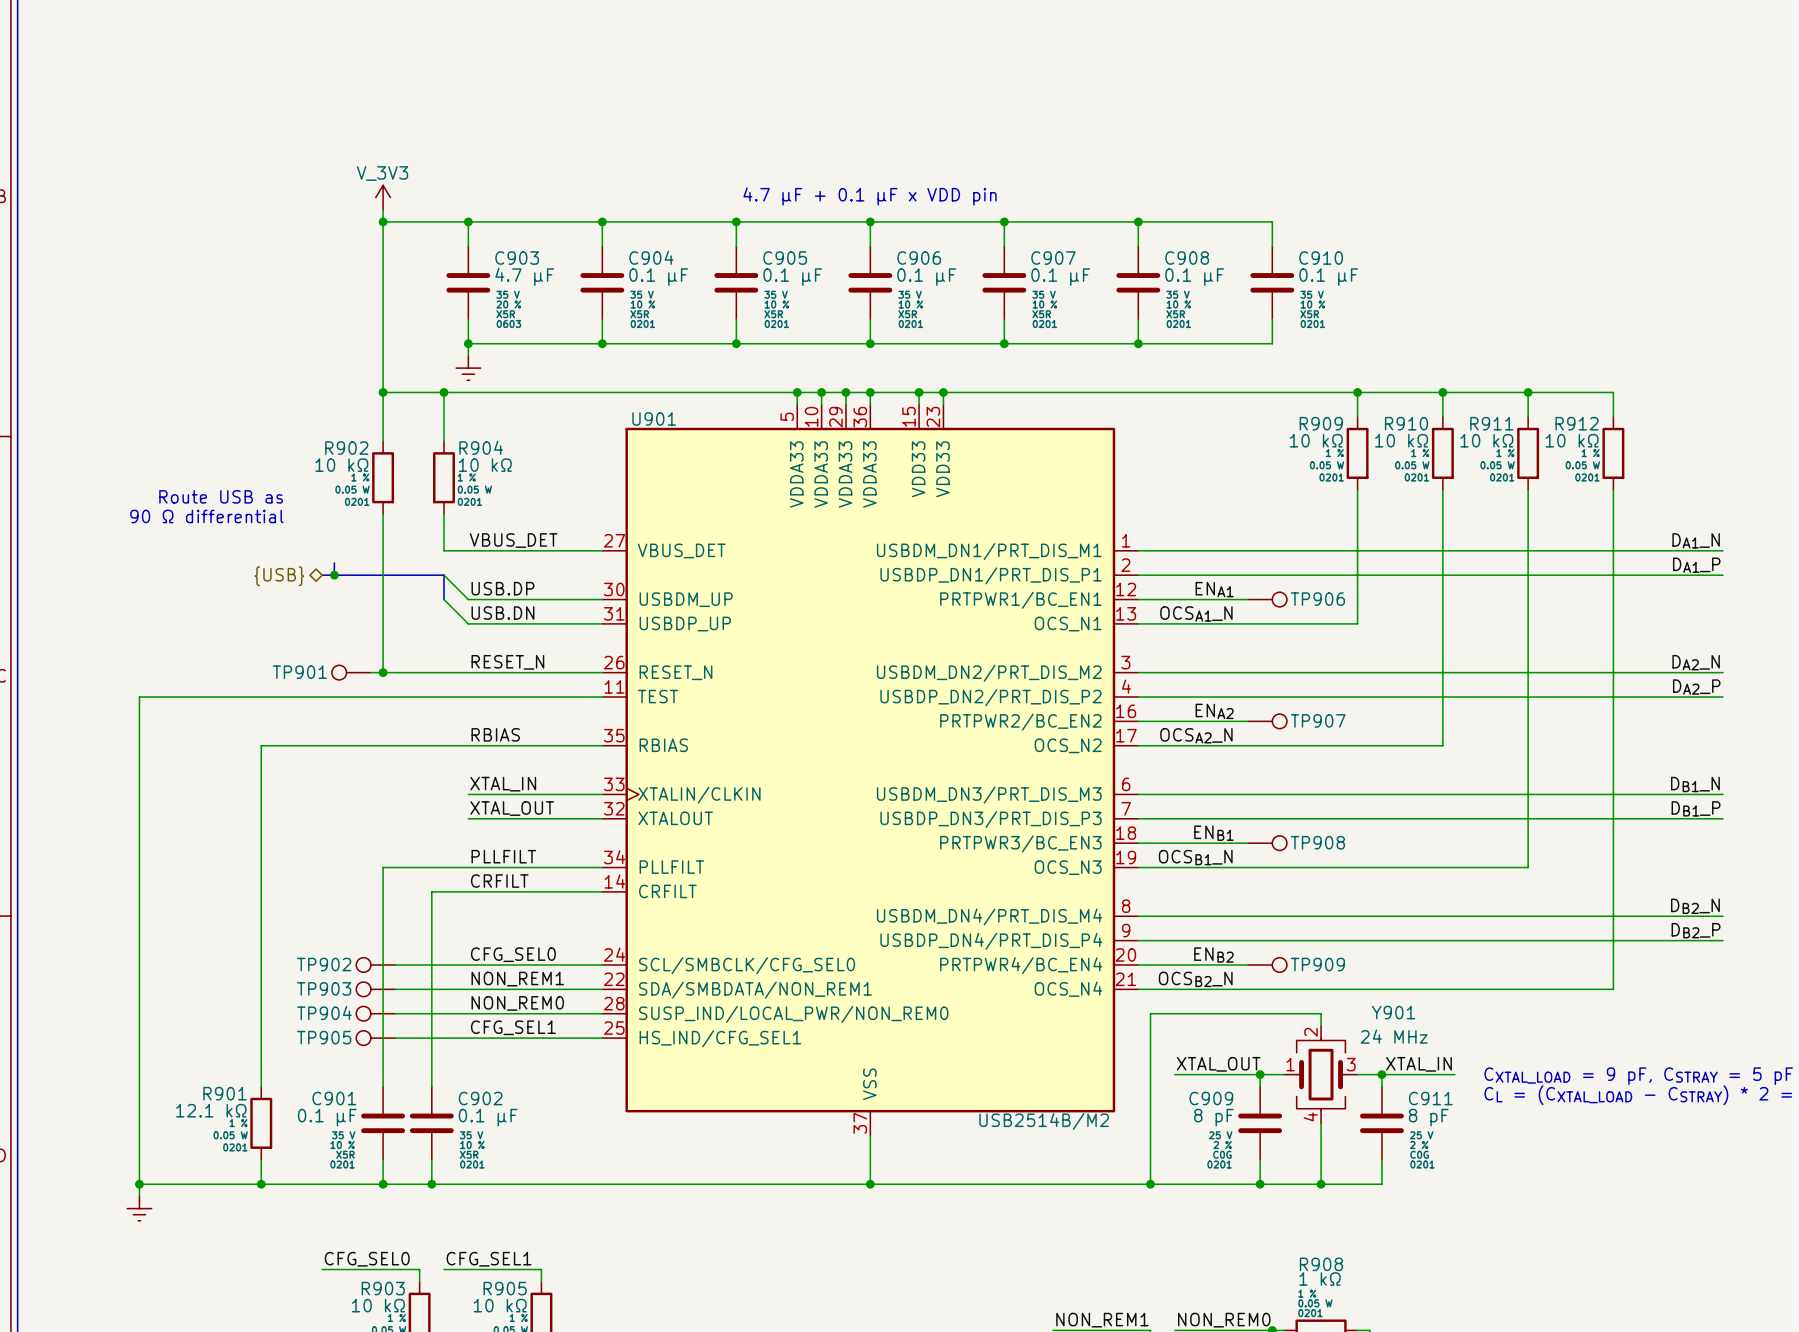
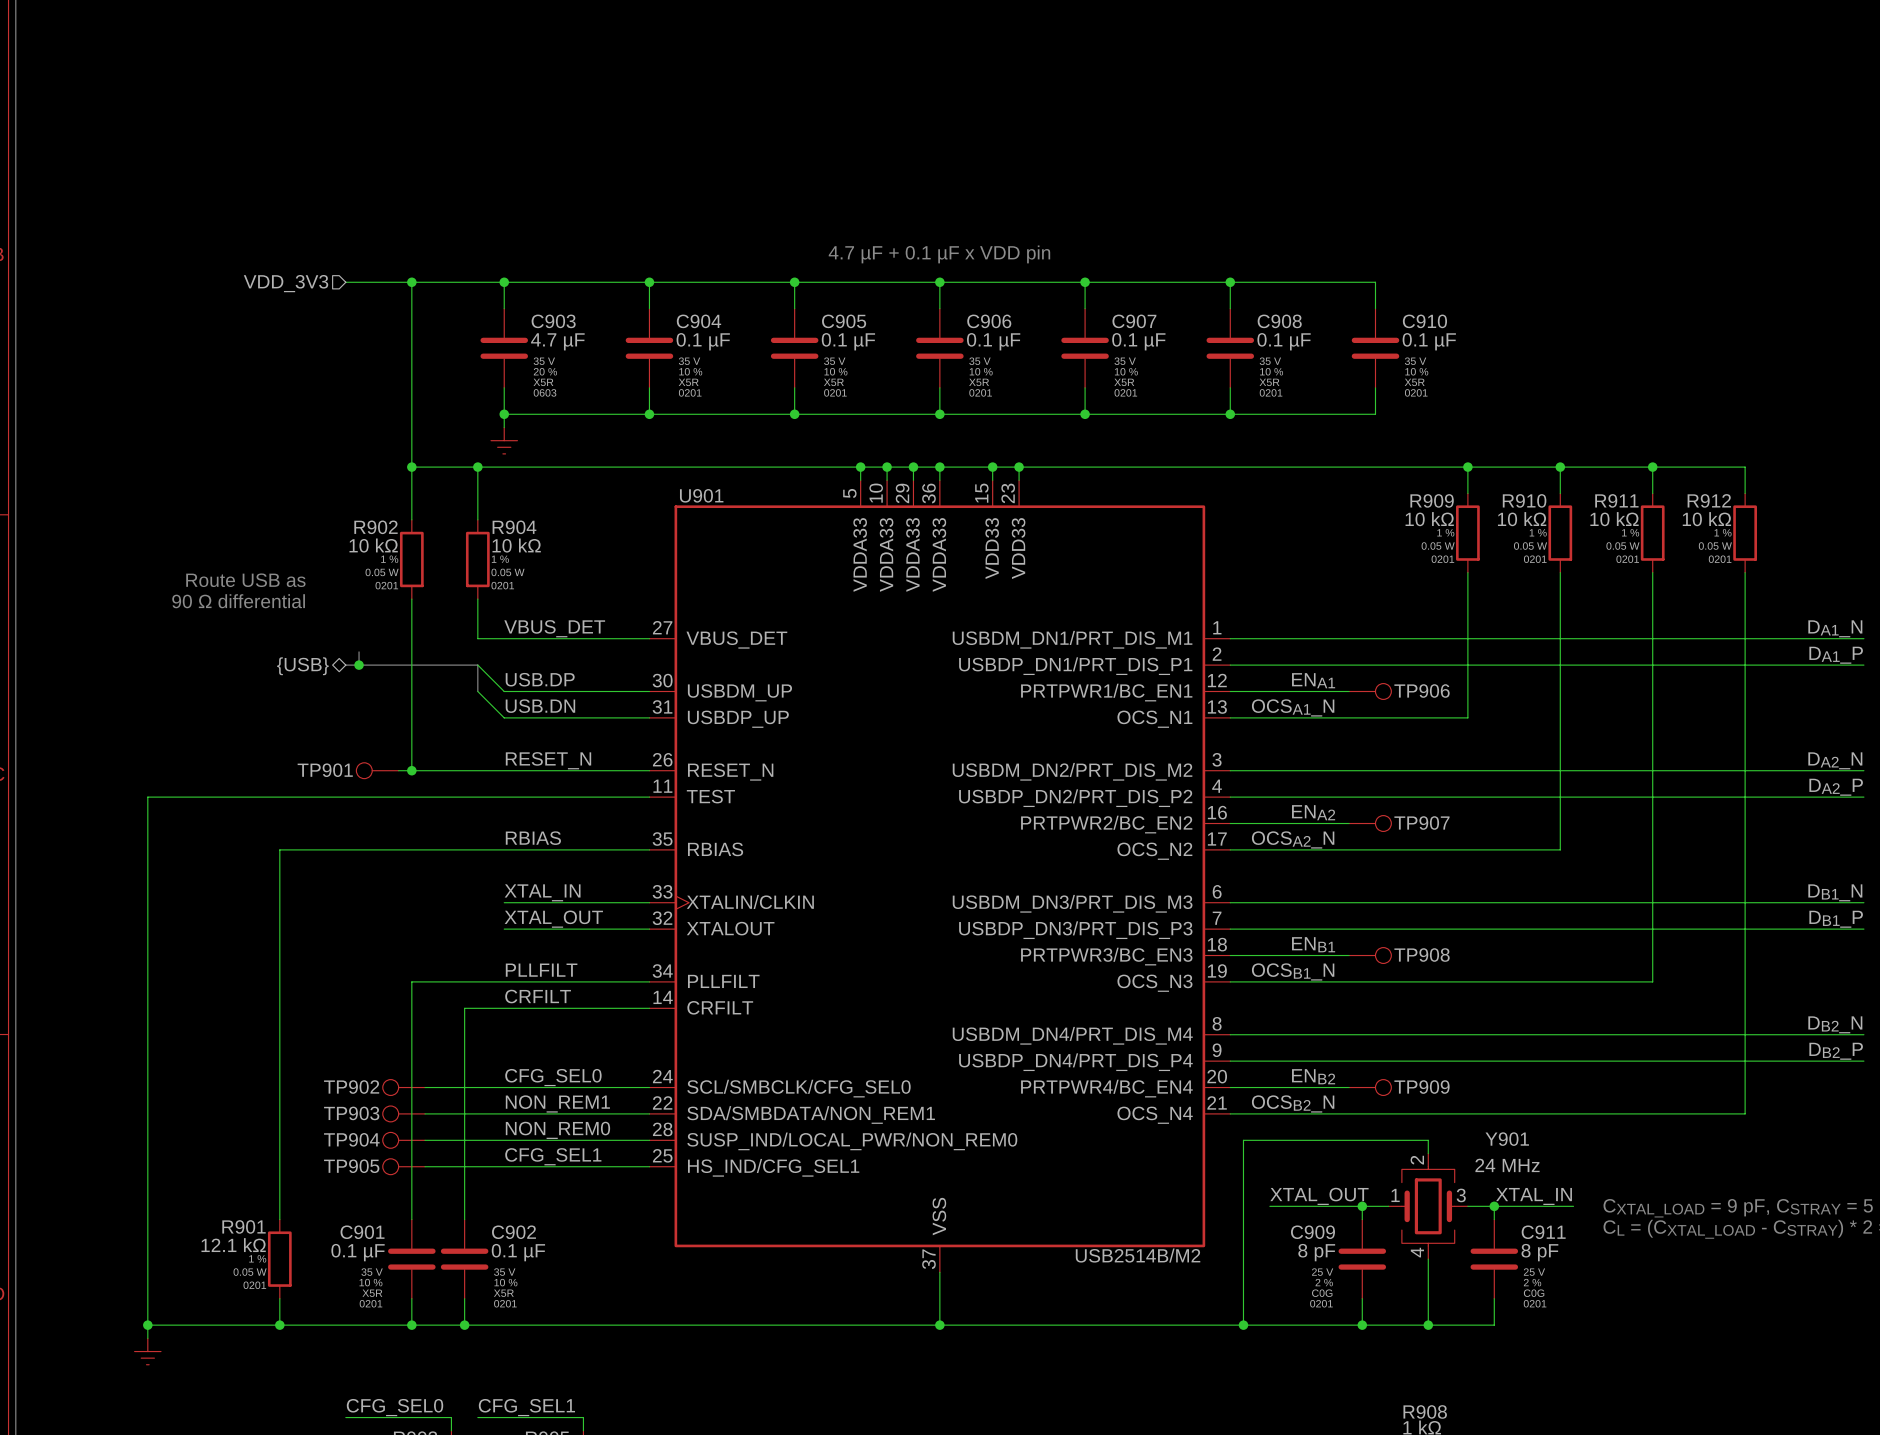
power symbol: V_3V3 (383, 197) -> none
wire: (383, 209) (383, 221) -> (345, 282) (411, 282)
hierarchical label: none -> VDD_3V3 (286, 283)

